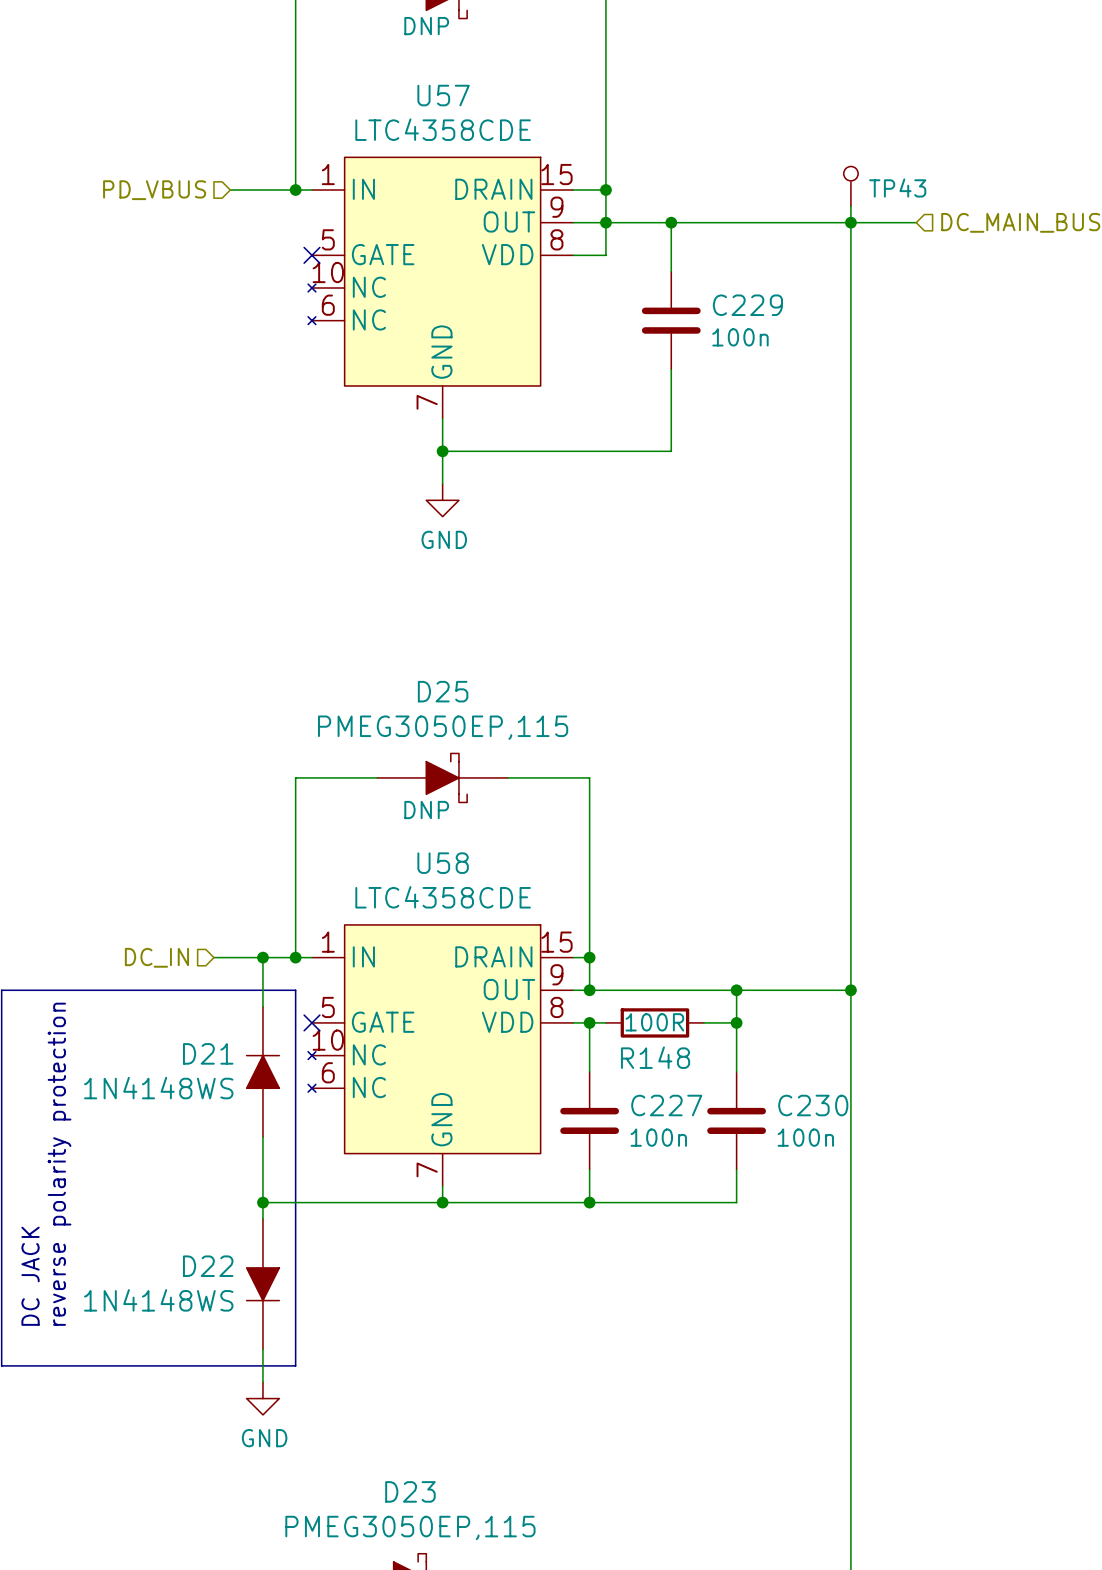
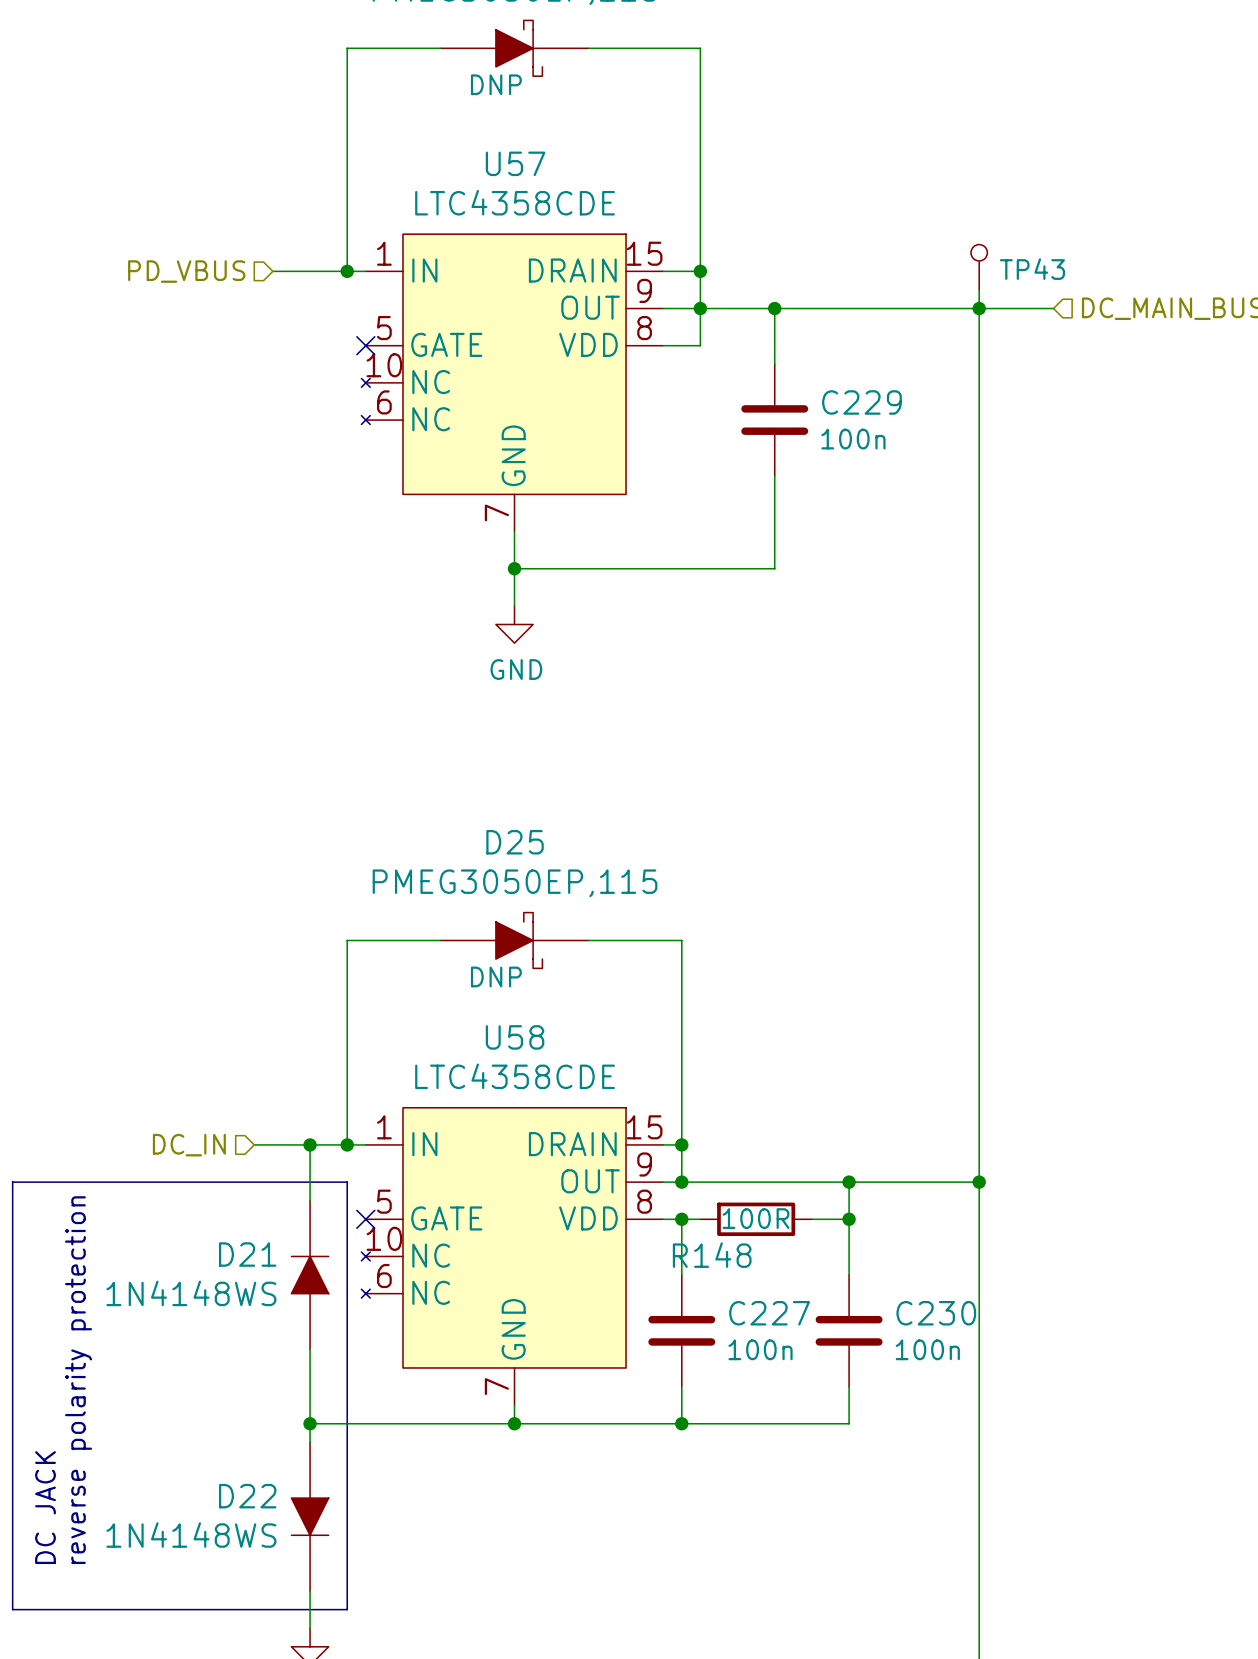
R148 name position: R148 (655, 1057) -> R148 (712, 1255)

